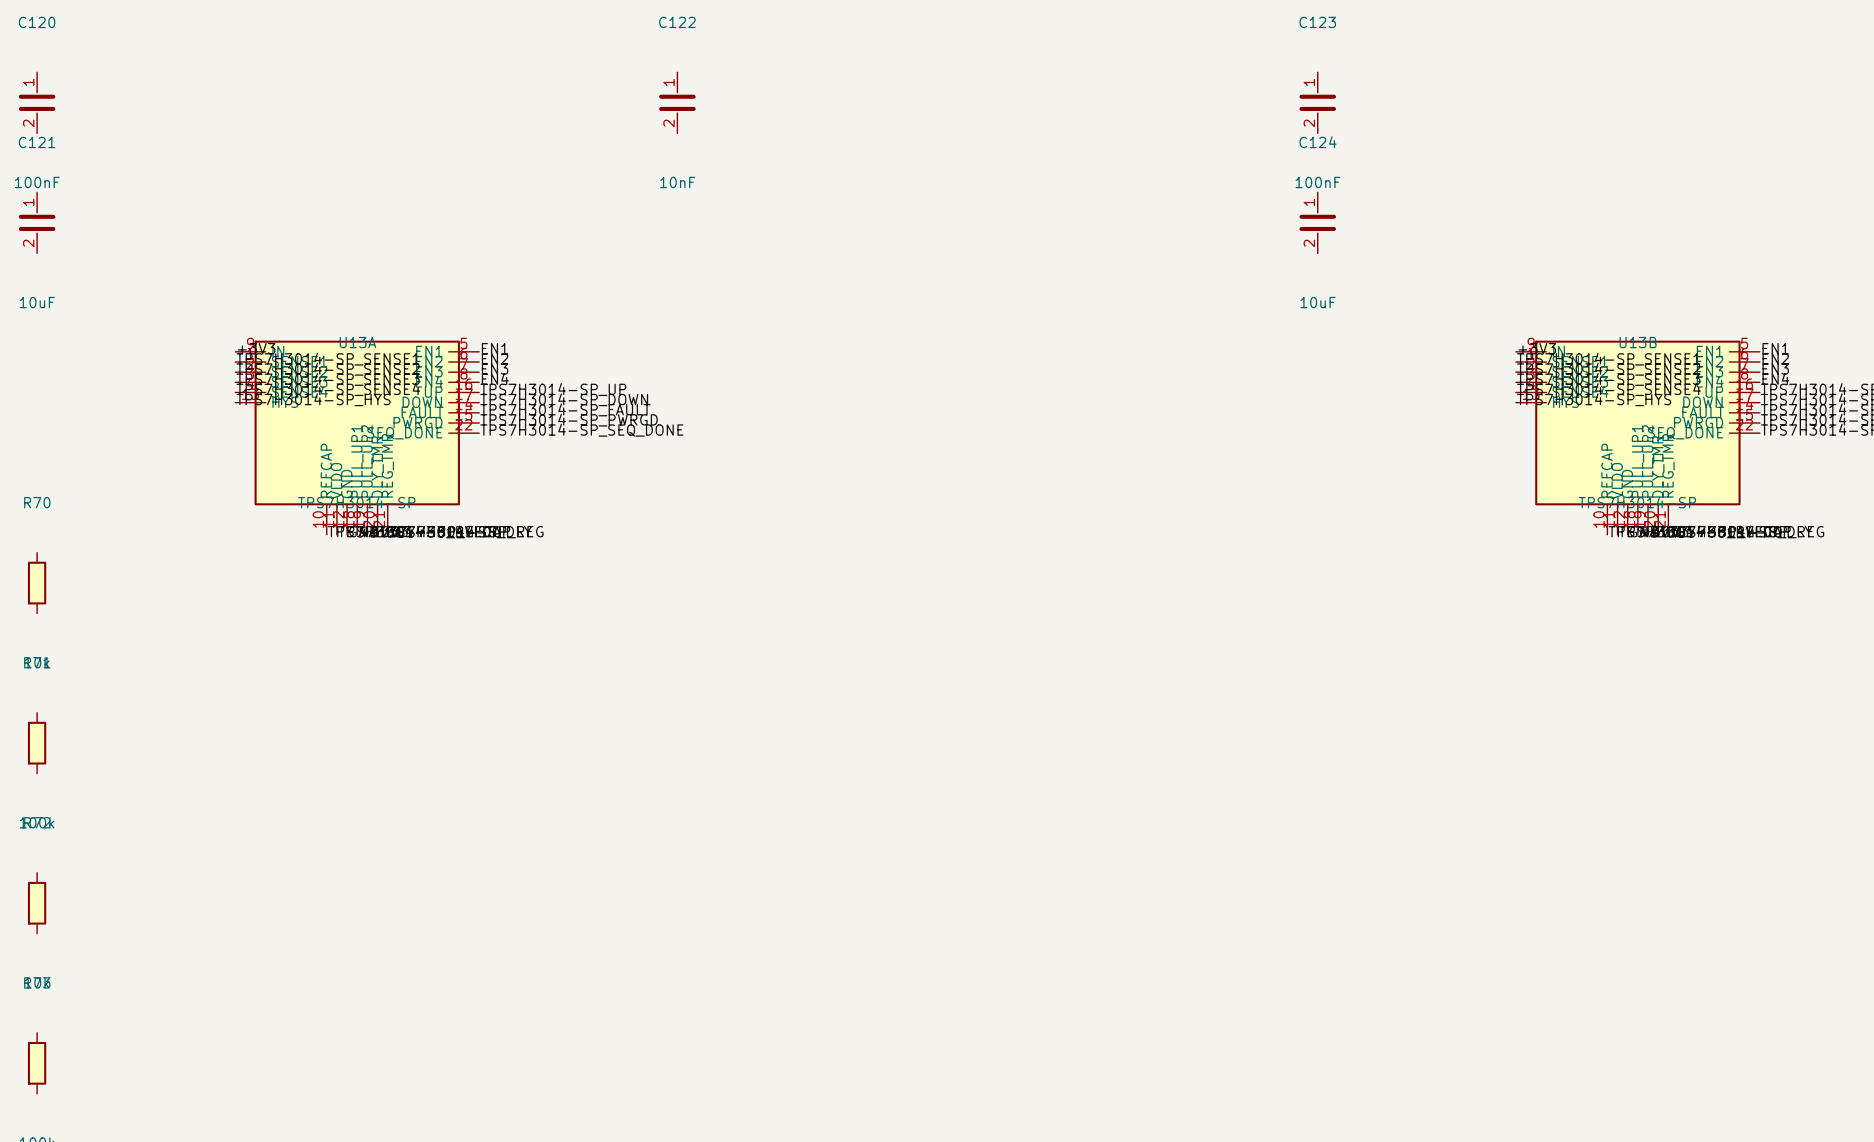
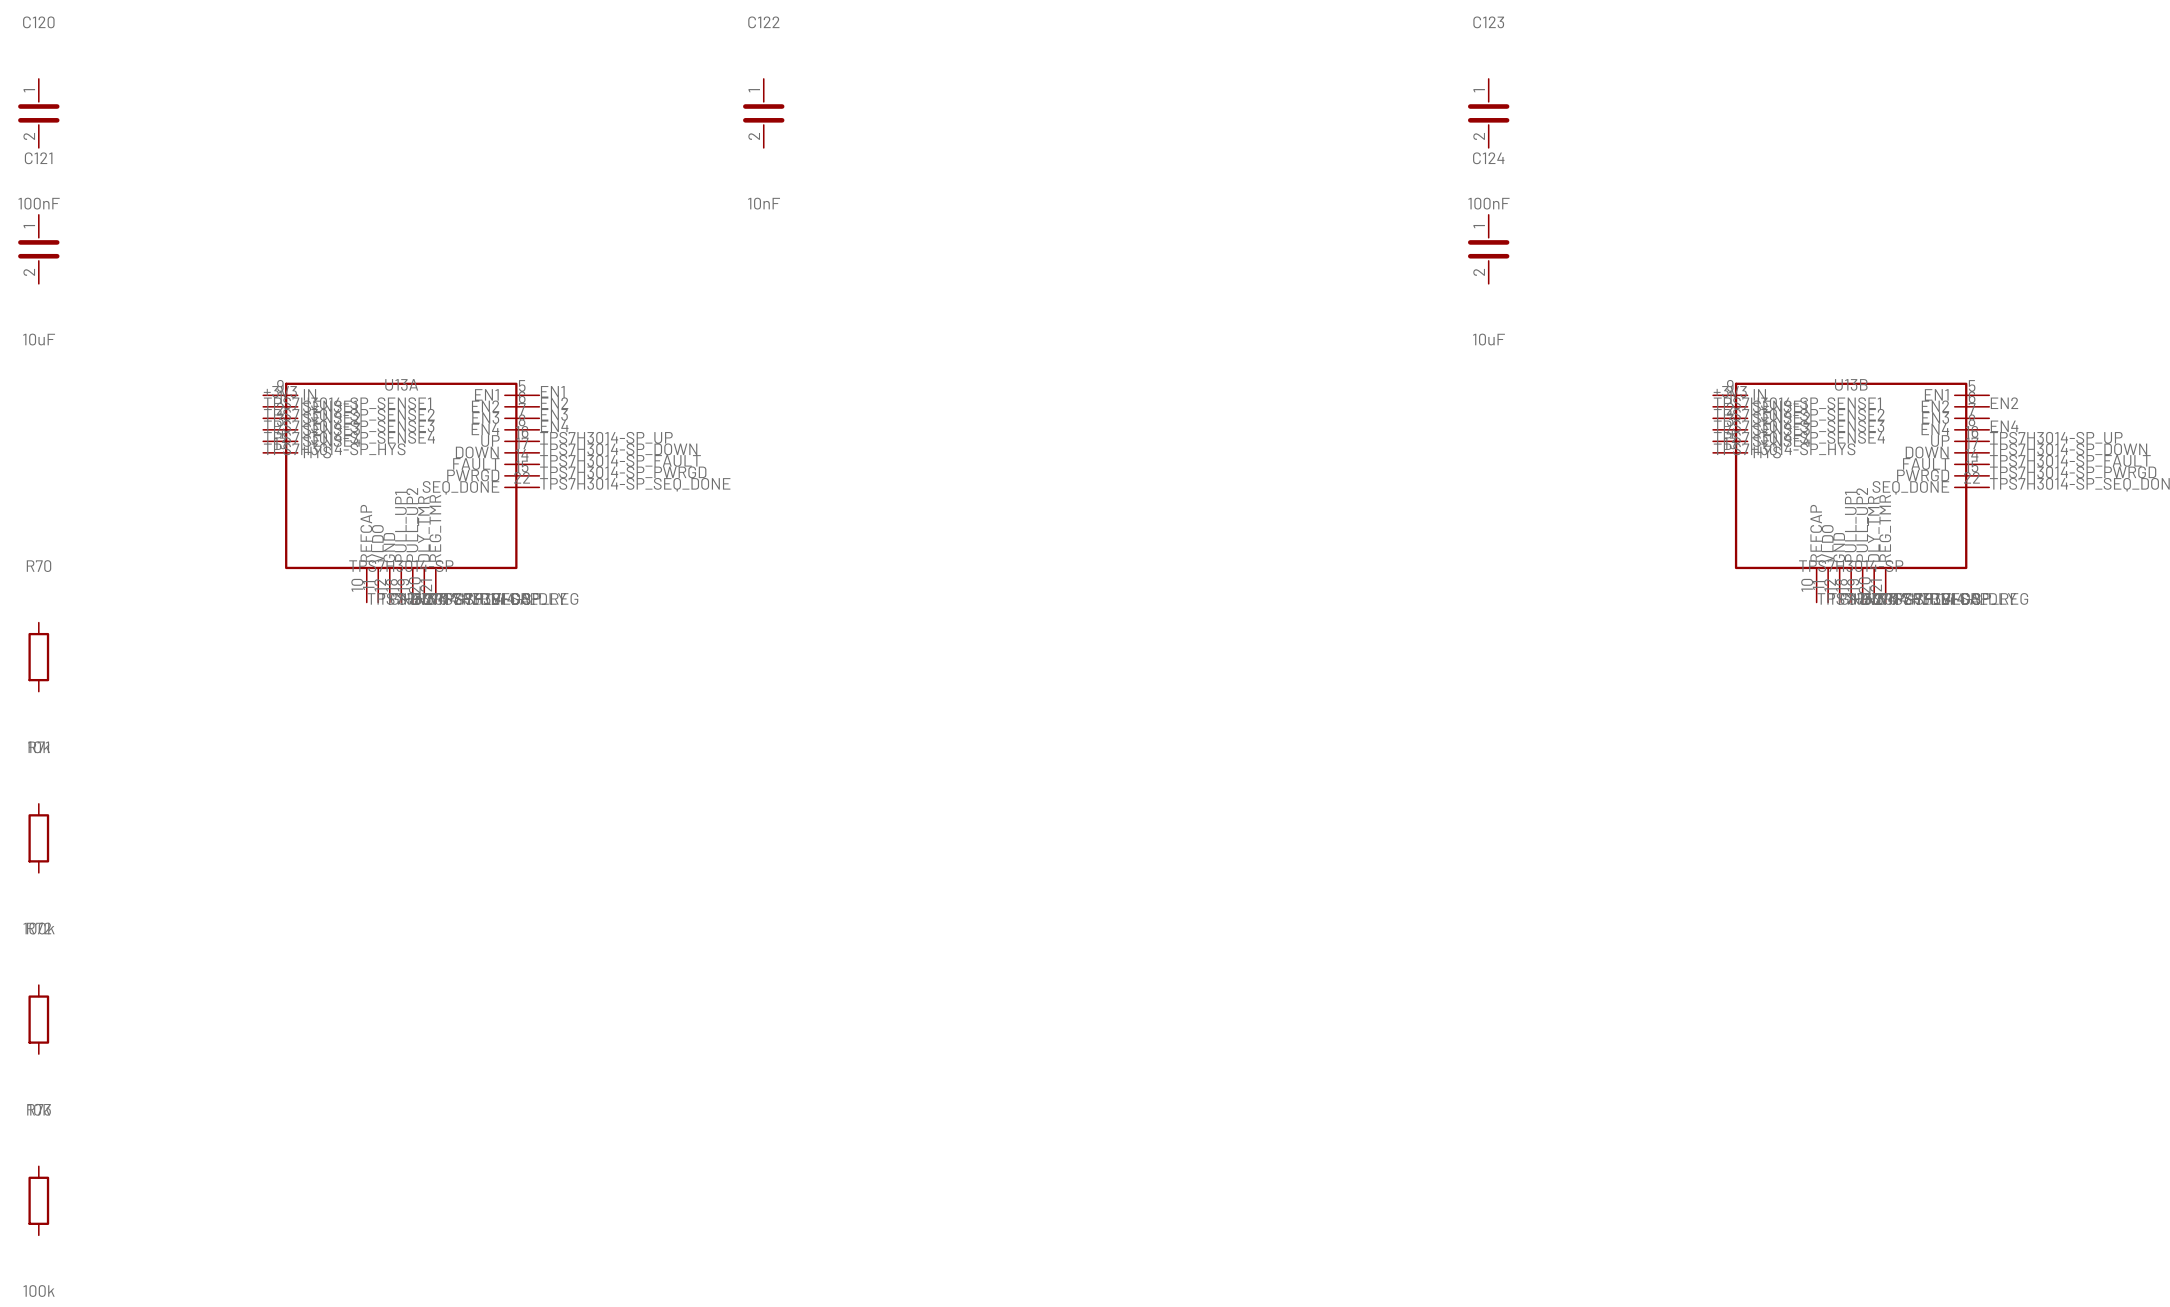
label: EN1 (1775, 348) -> none
label: EN3 (1775, 369) -> none

